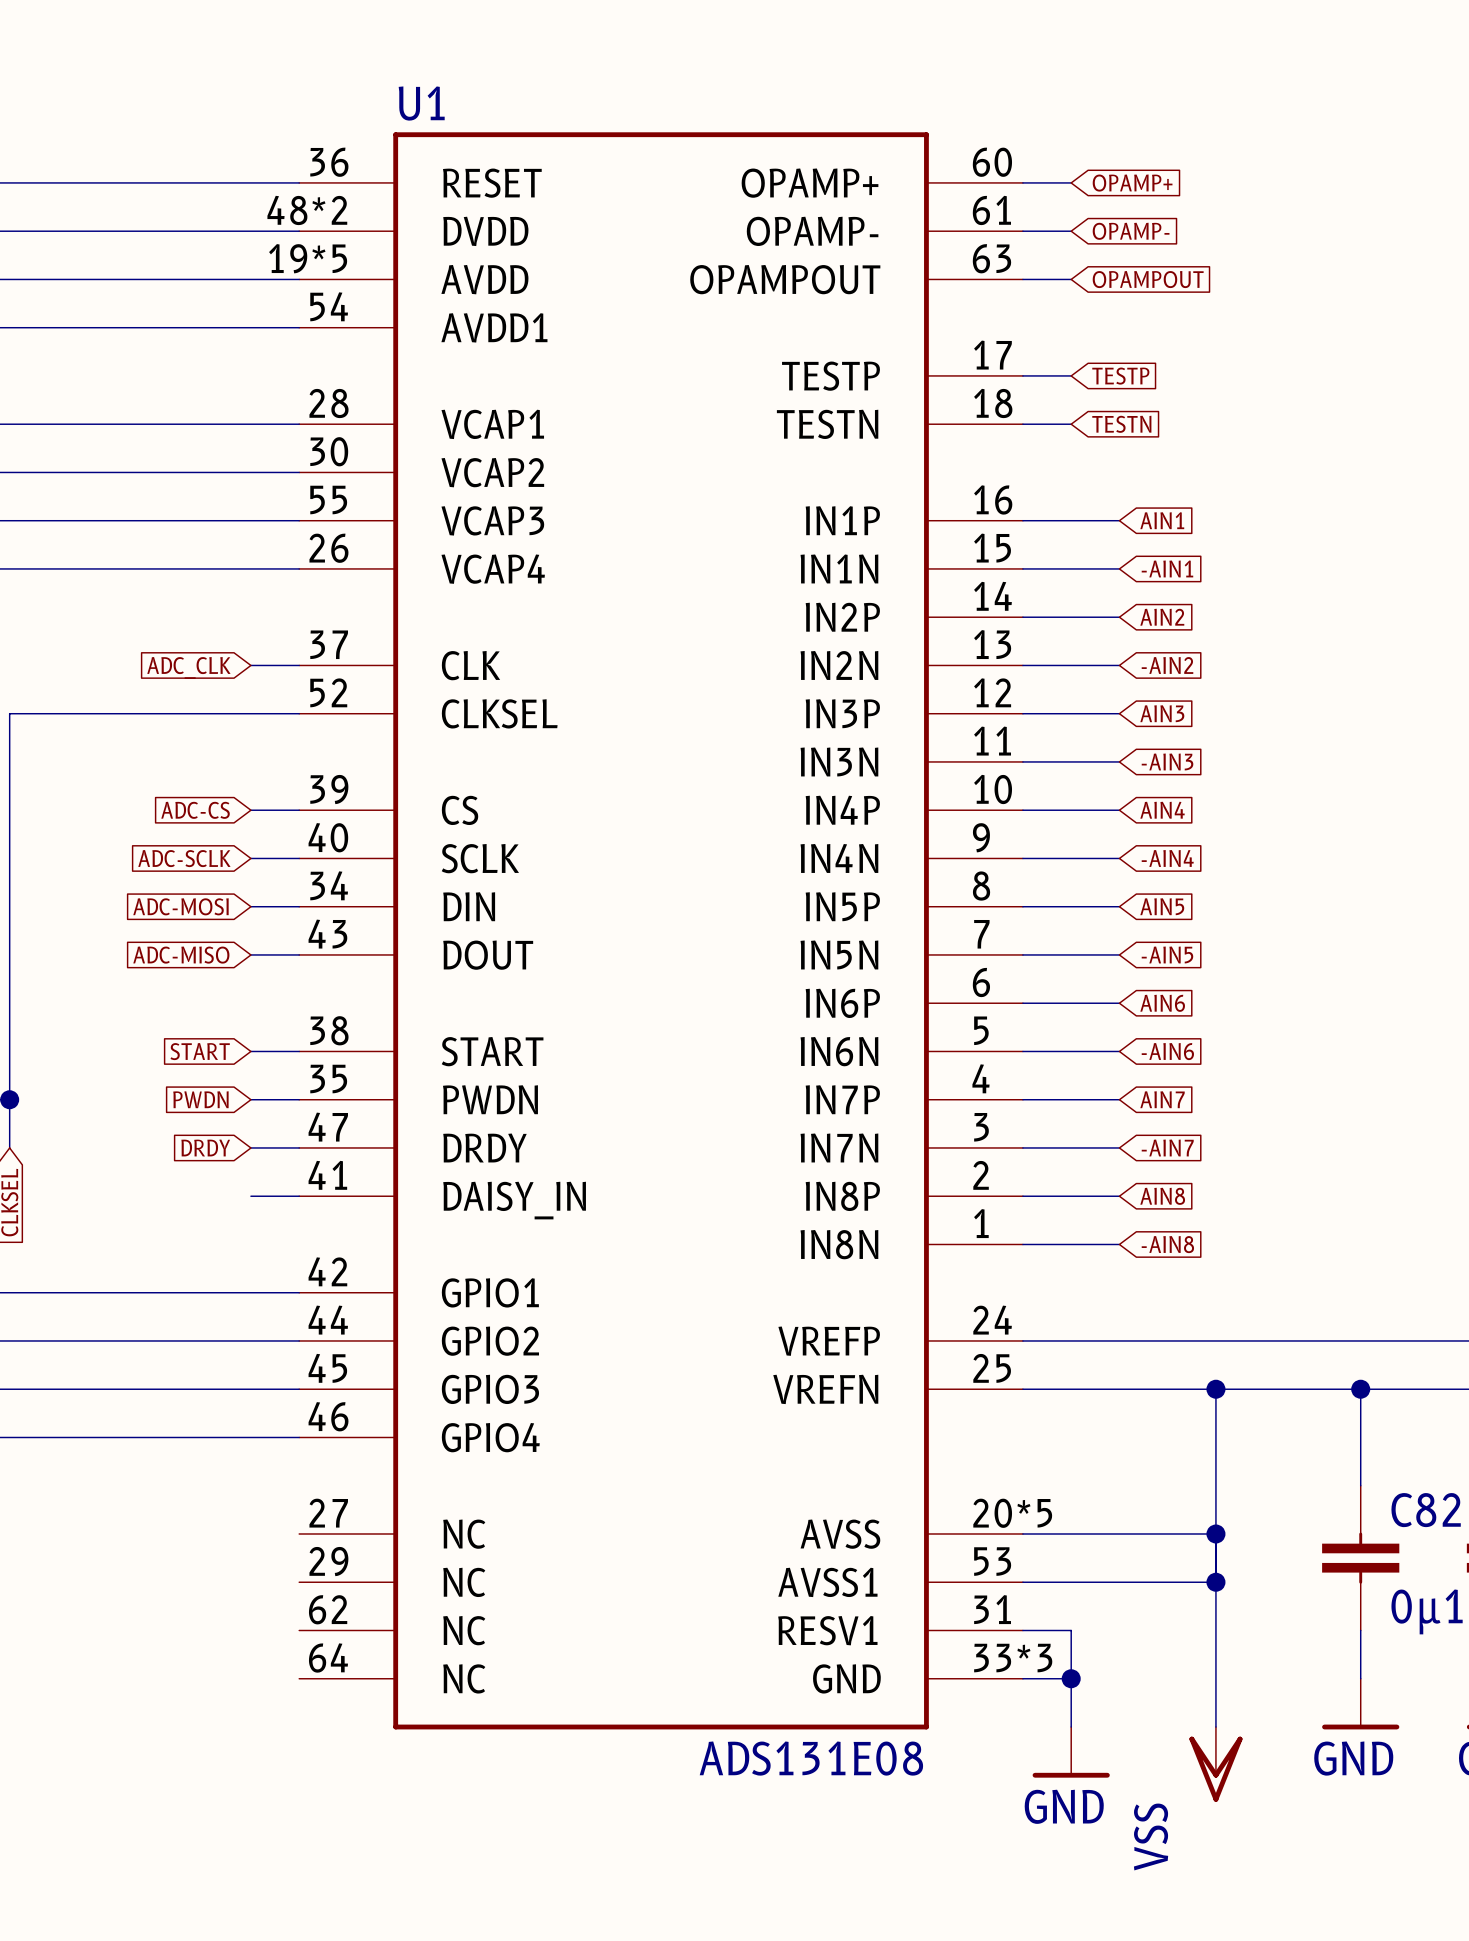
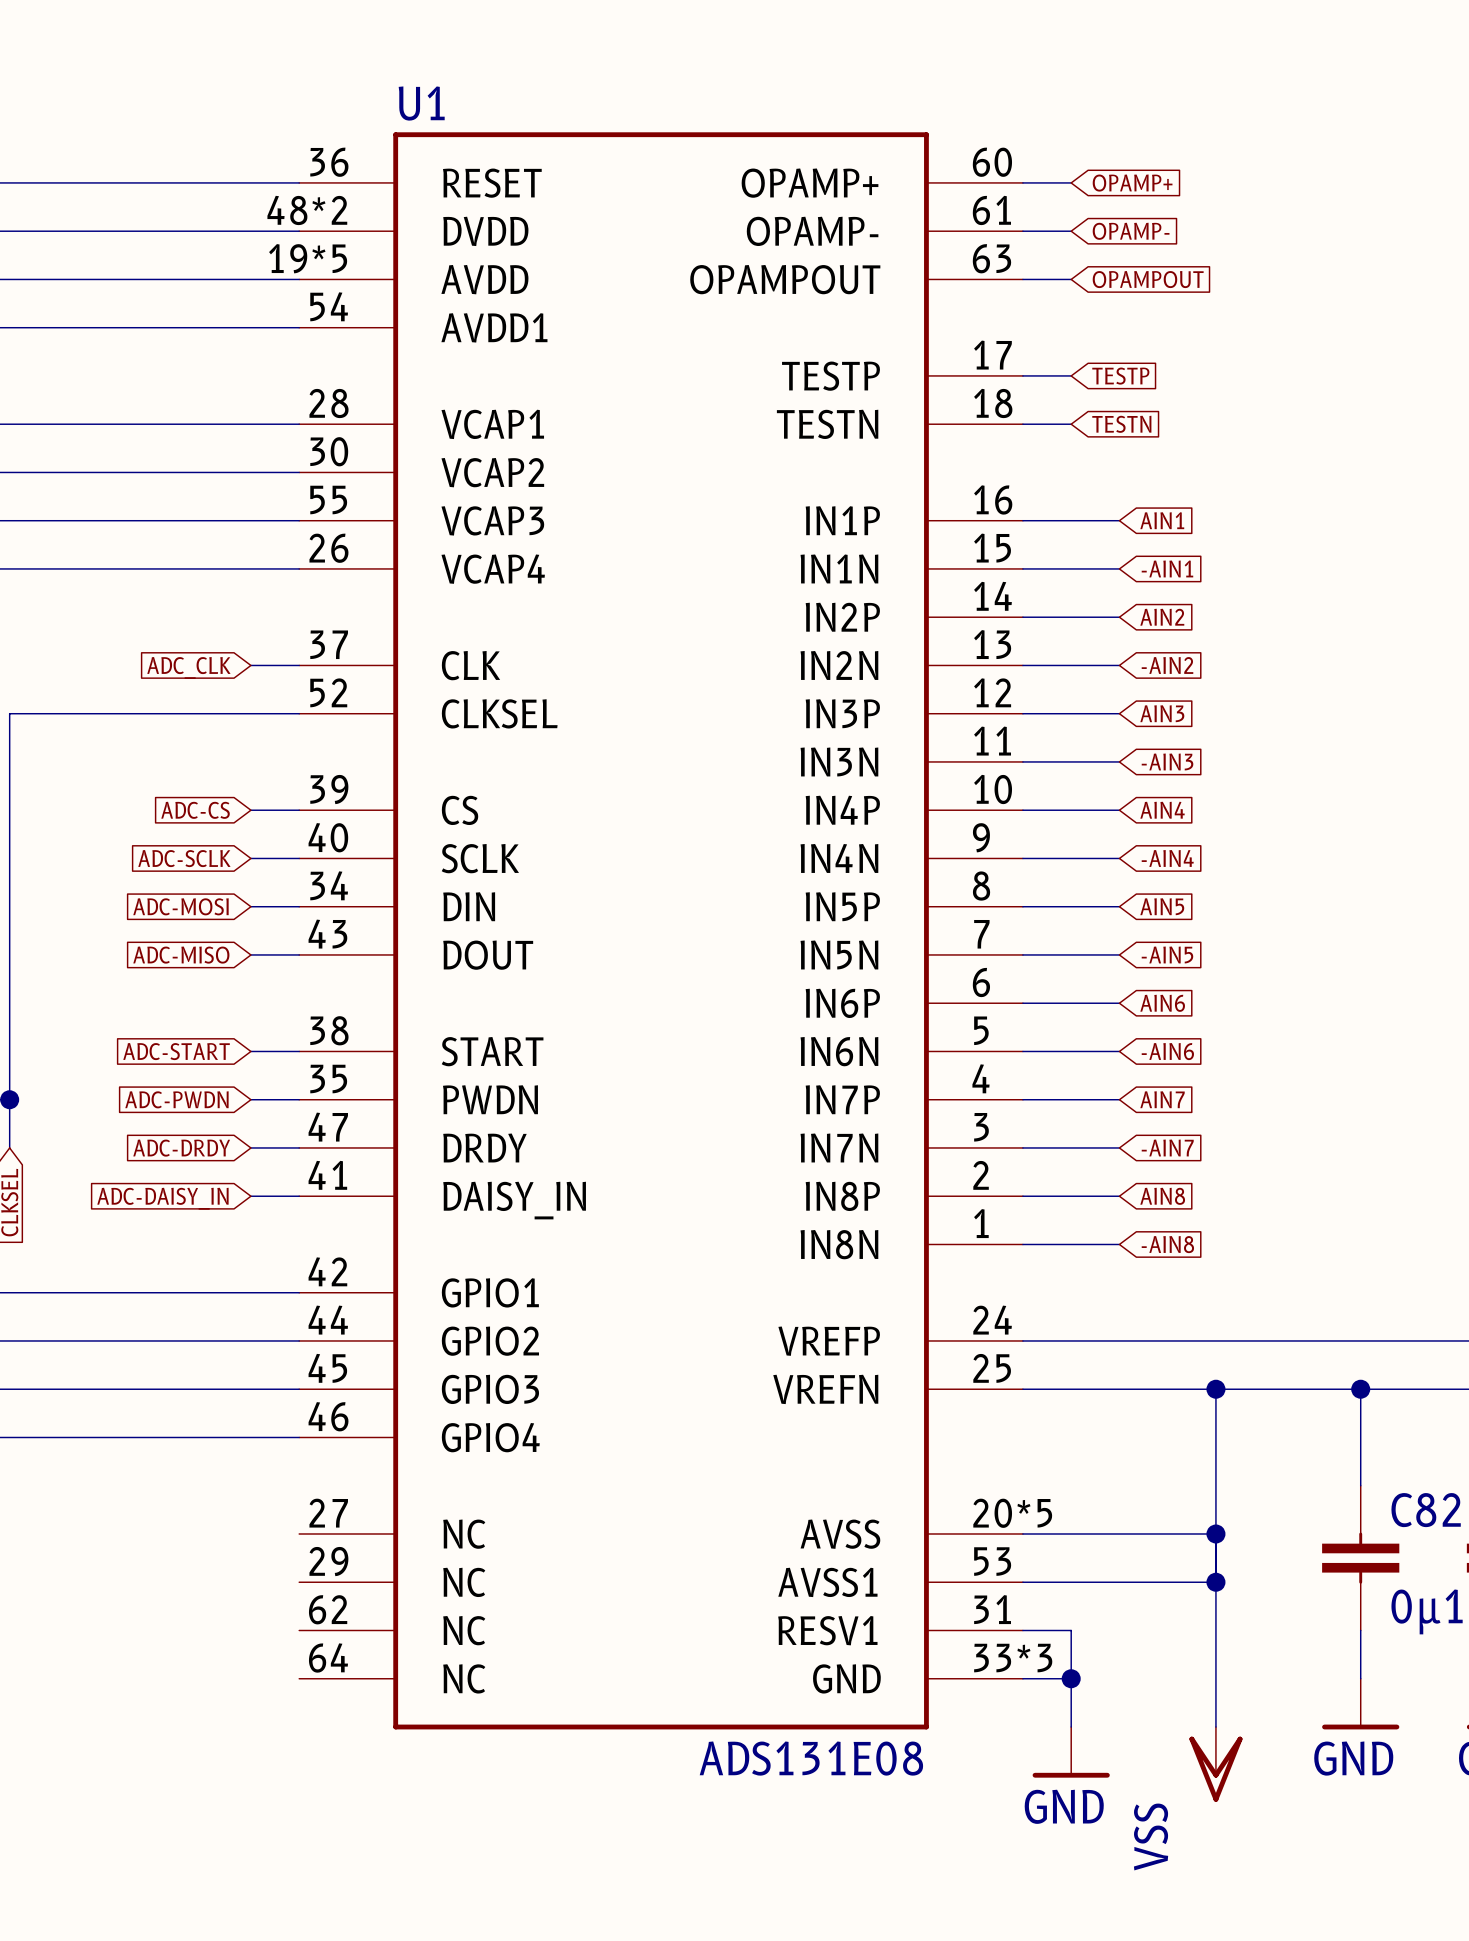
global label: START (200, 1051) -> ADC-START (176, 1051)
global label: PWDN (200, 1099) -> ADC-PWDN (176, 1099)
global label: DRDY (205, 1147) -> ADC-DRDY (181, 1148)
global label: none -> ADC-DAISY_IN (162, 1198)

